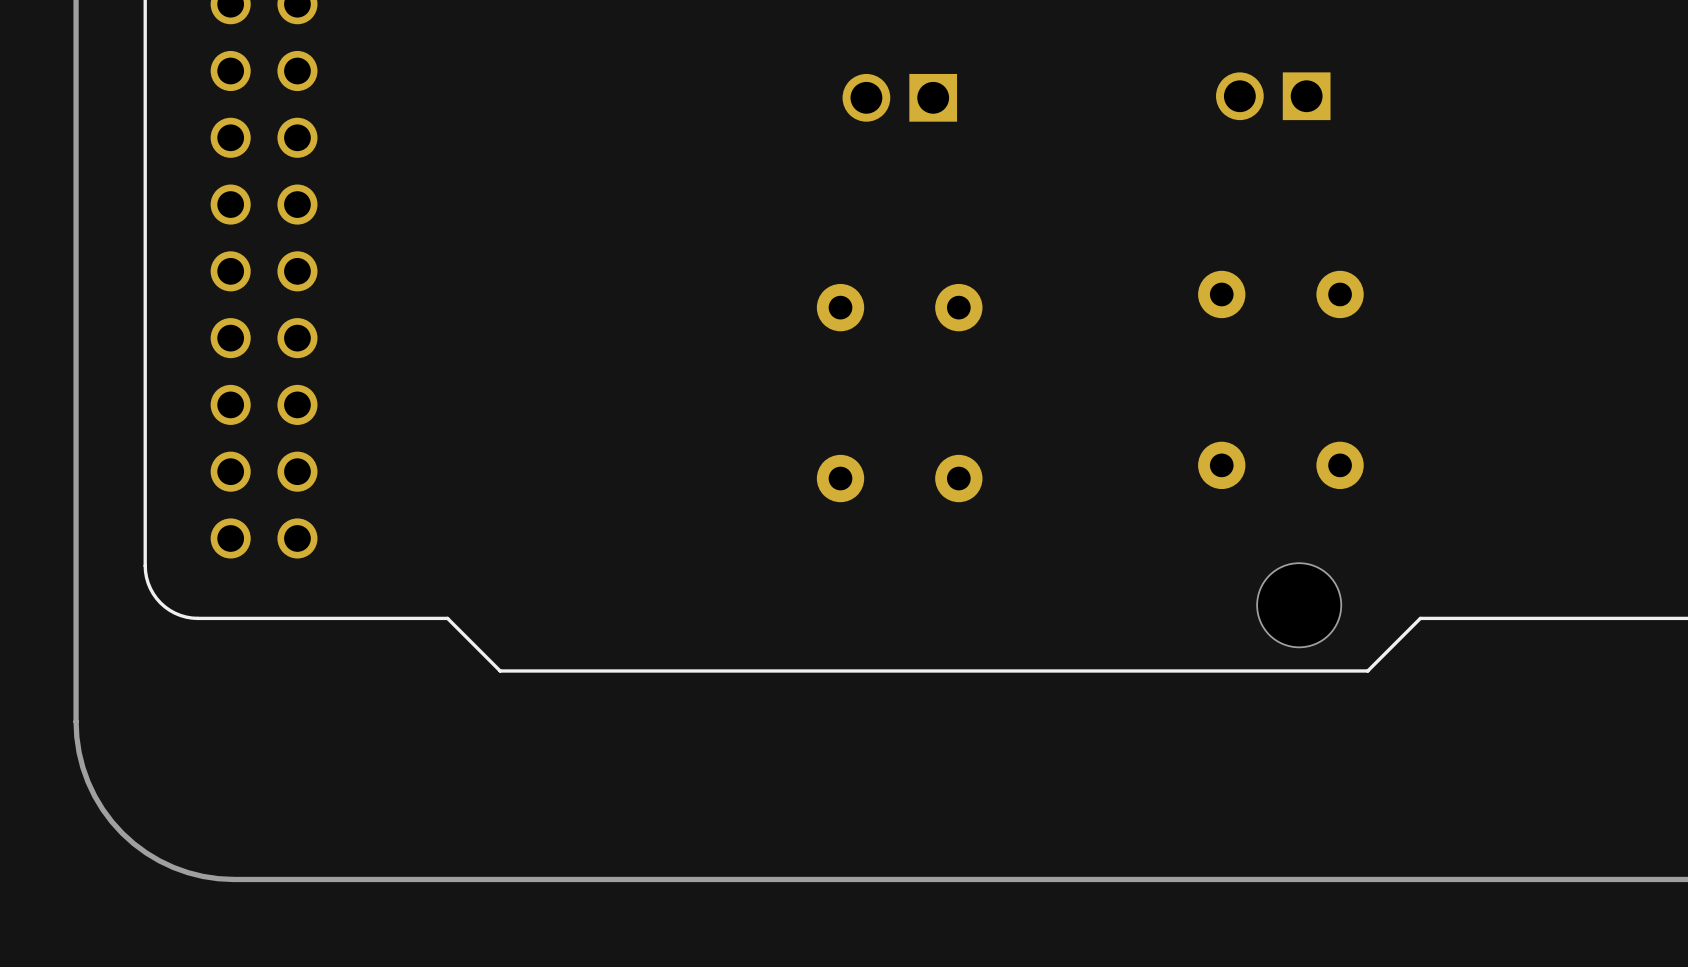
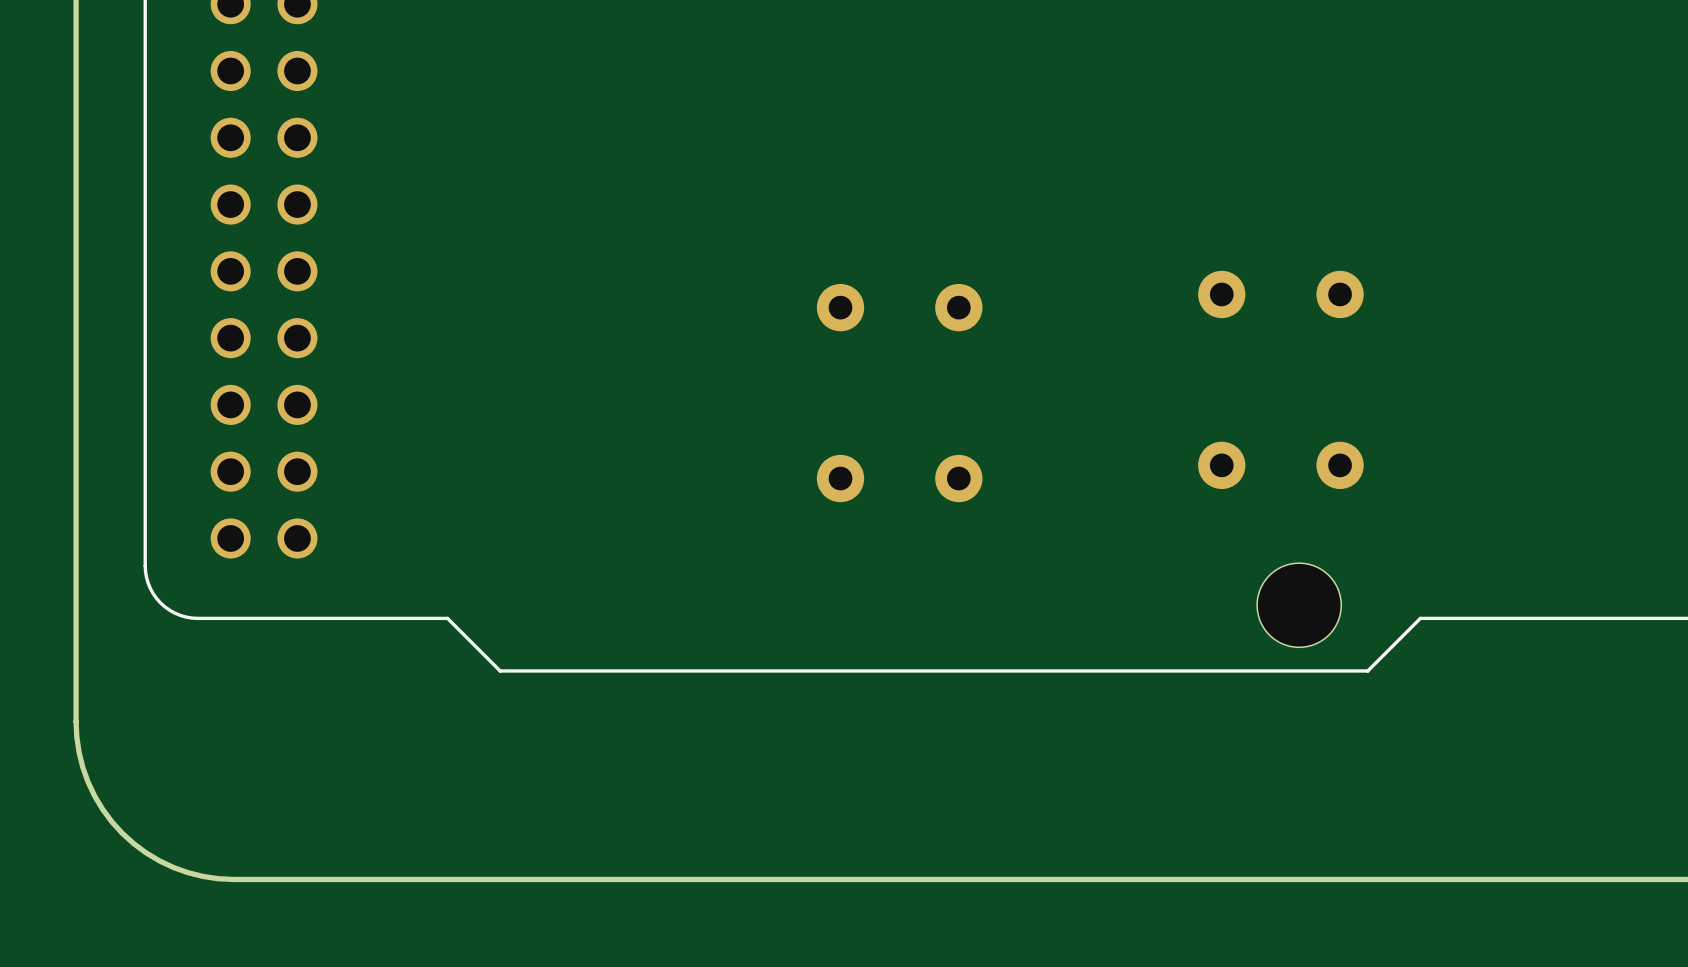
part: (1273, 96) -> none
part: (899, 97) -> none

